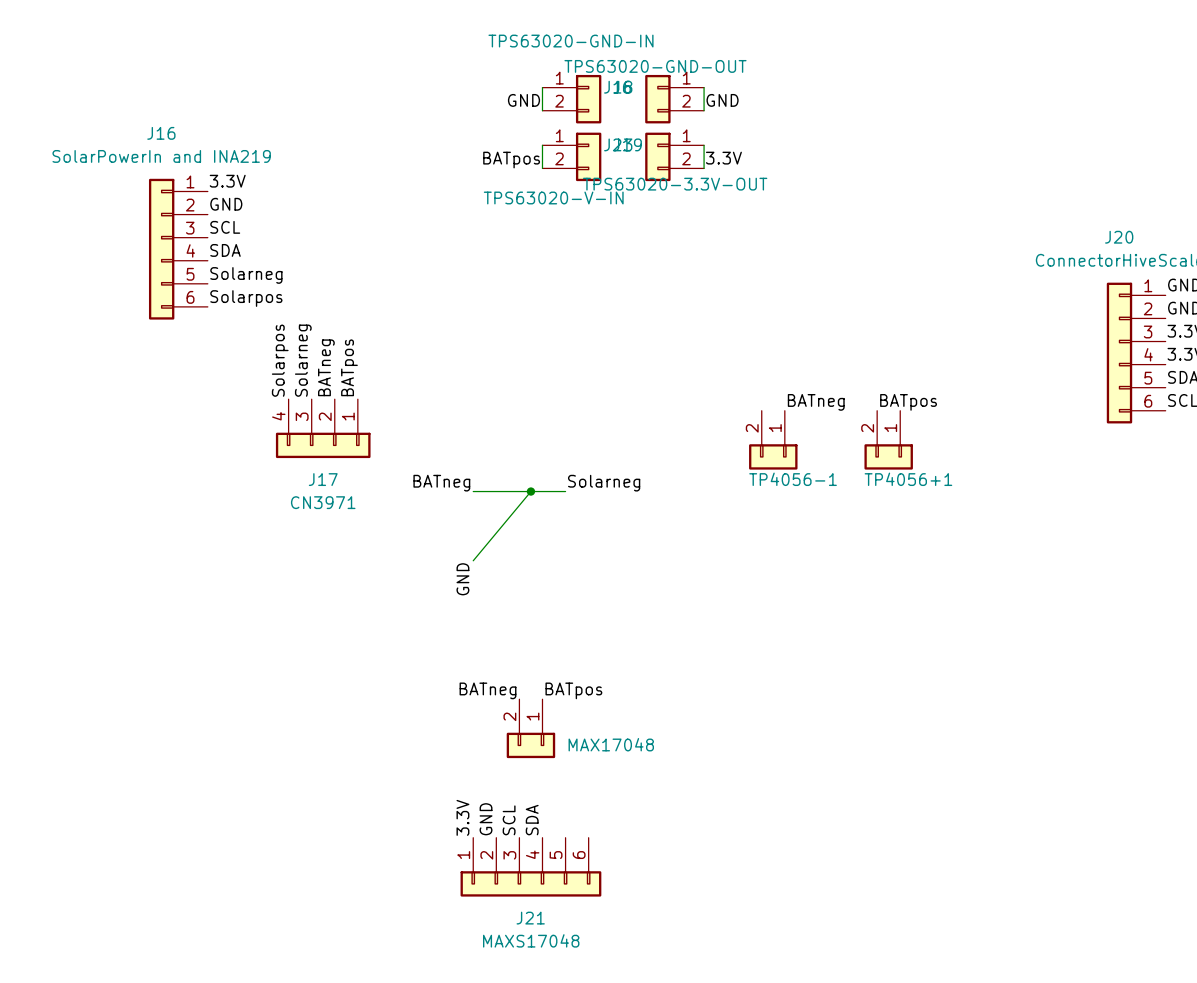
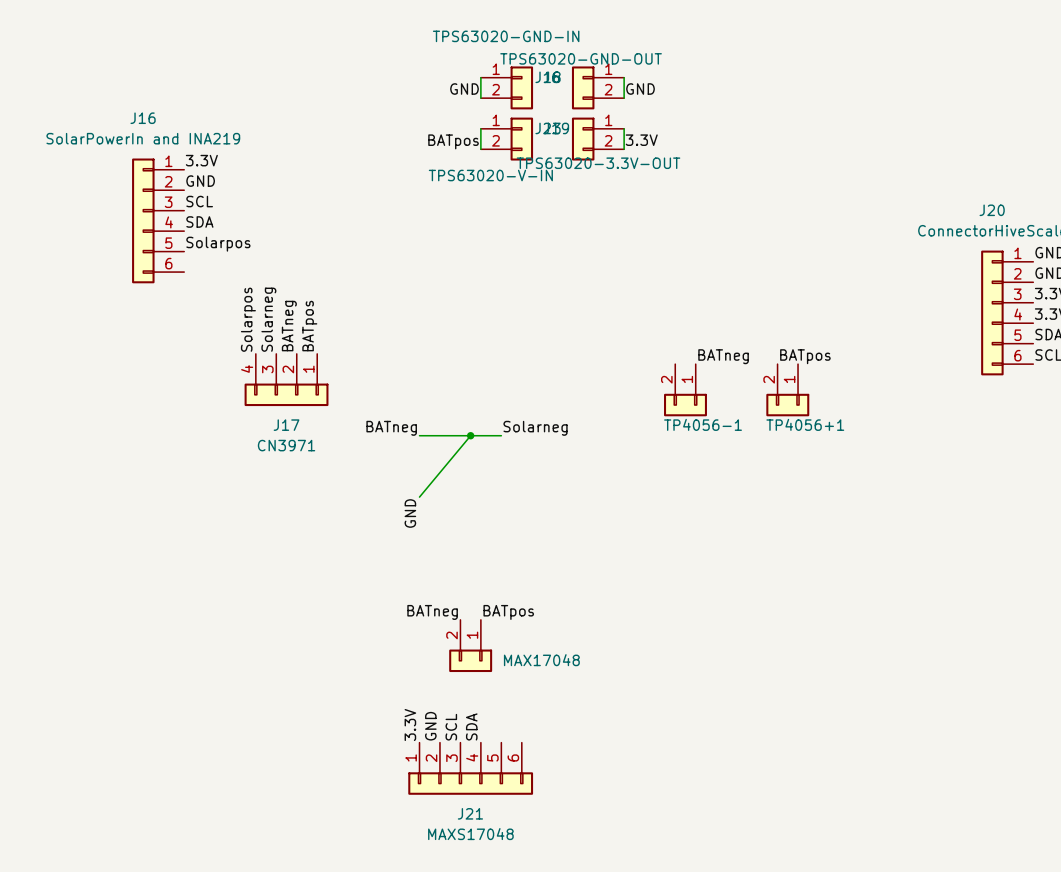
label: Solarneg (246, 275) -> Solarpos (218, 244)
label: Solarpos (246, 298) -> none

